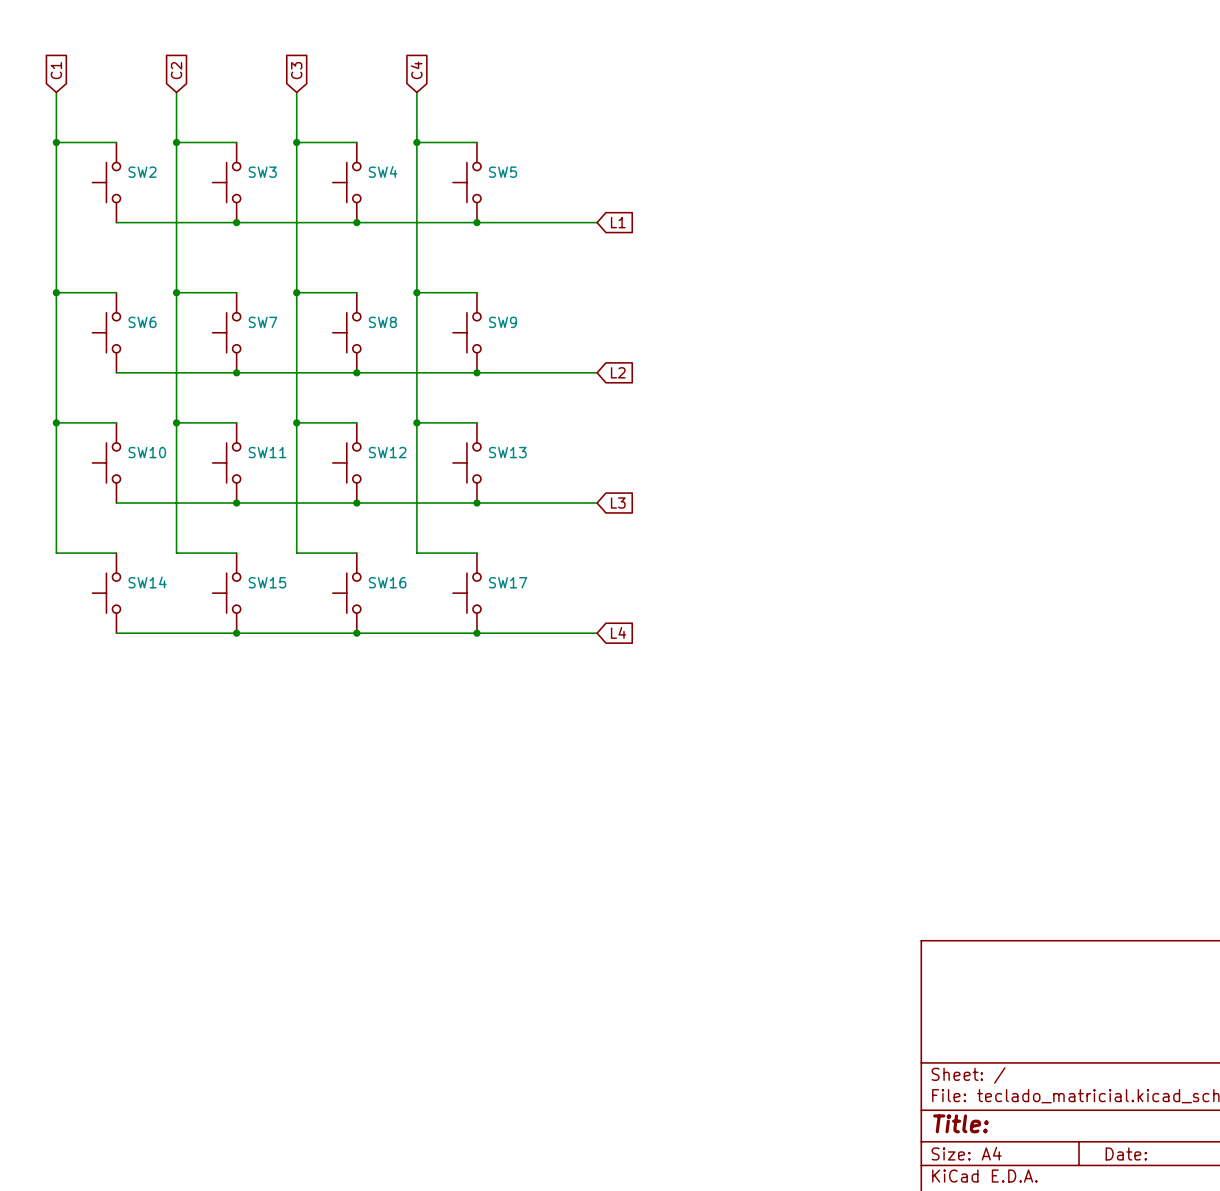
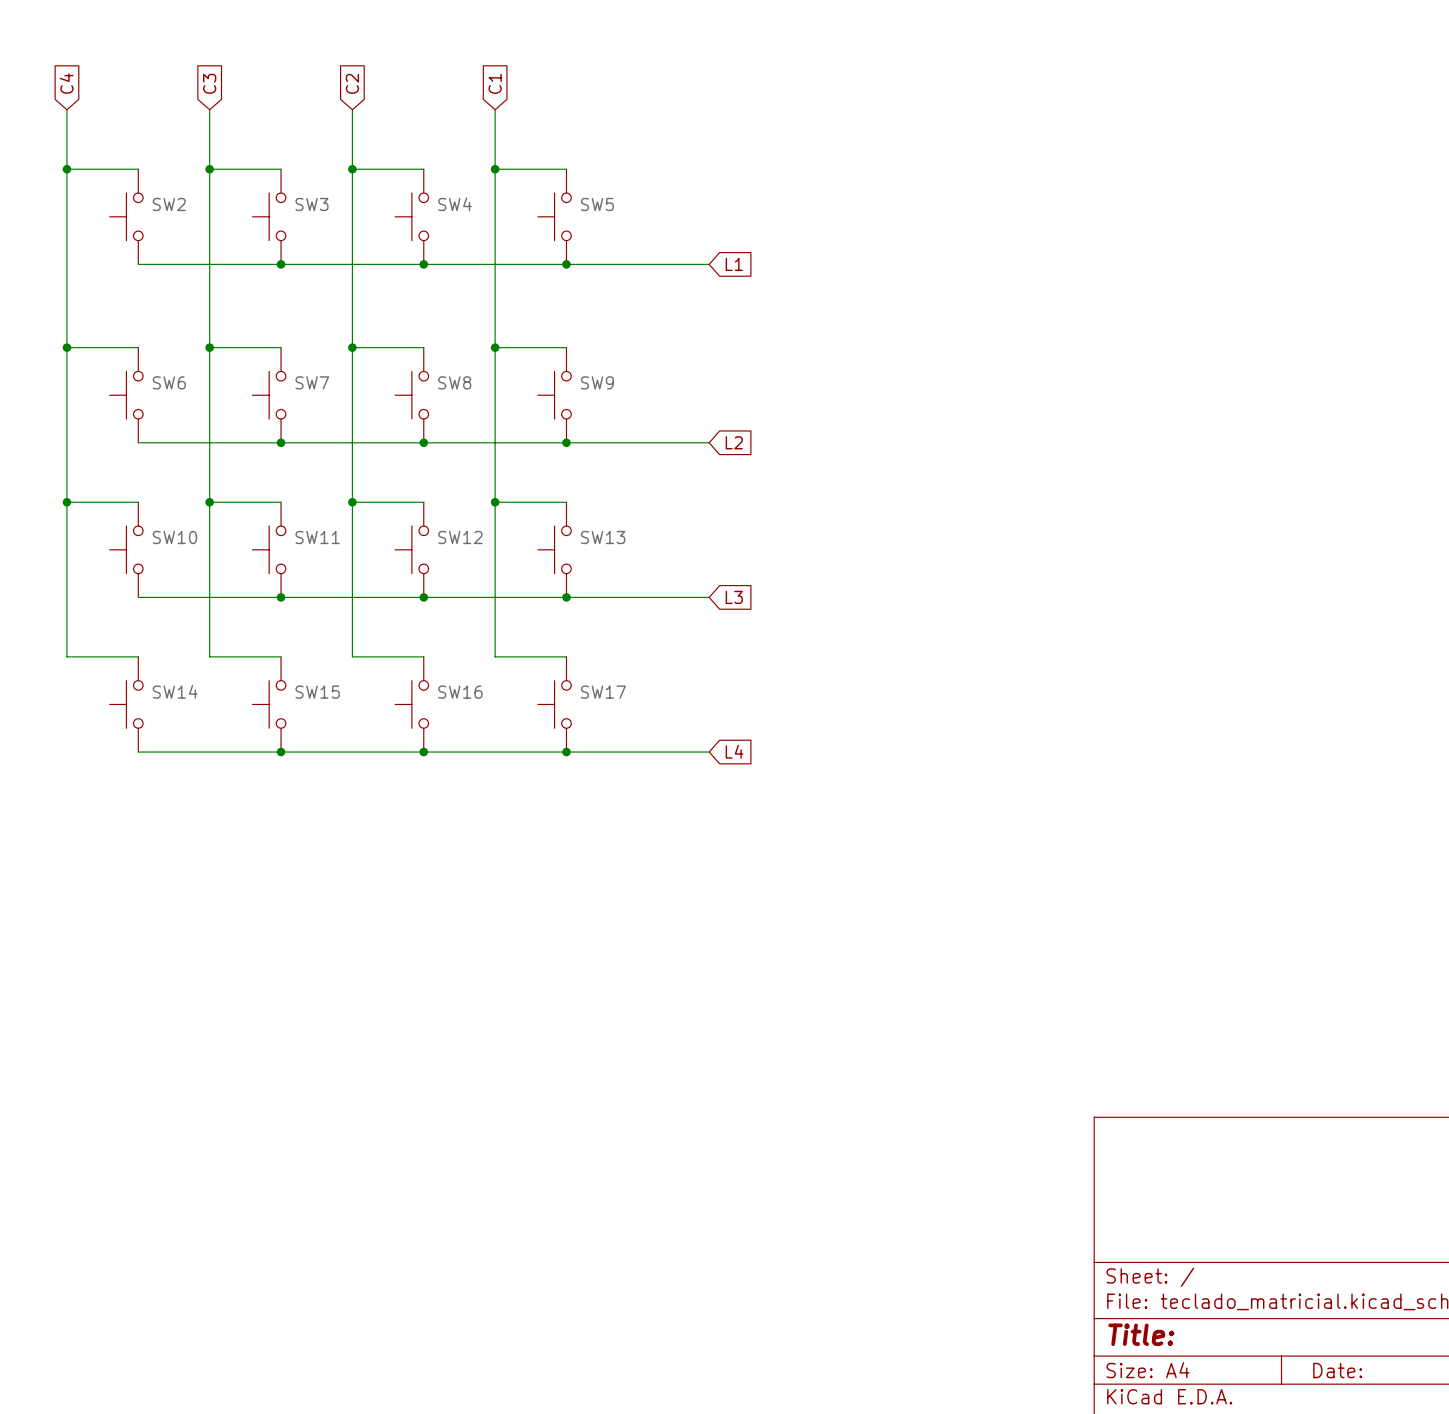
global label: C1 (56, 70) -> C4 (66, 83)
global label: C2 (176, 70) -> C3 (209, 83)
global label: C3 (296, 70) -> C2 (352, 83)
global label: C4 (416, 70) -> C1 (495, 83)

